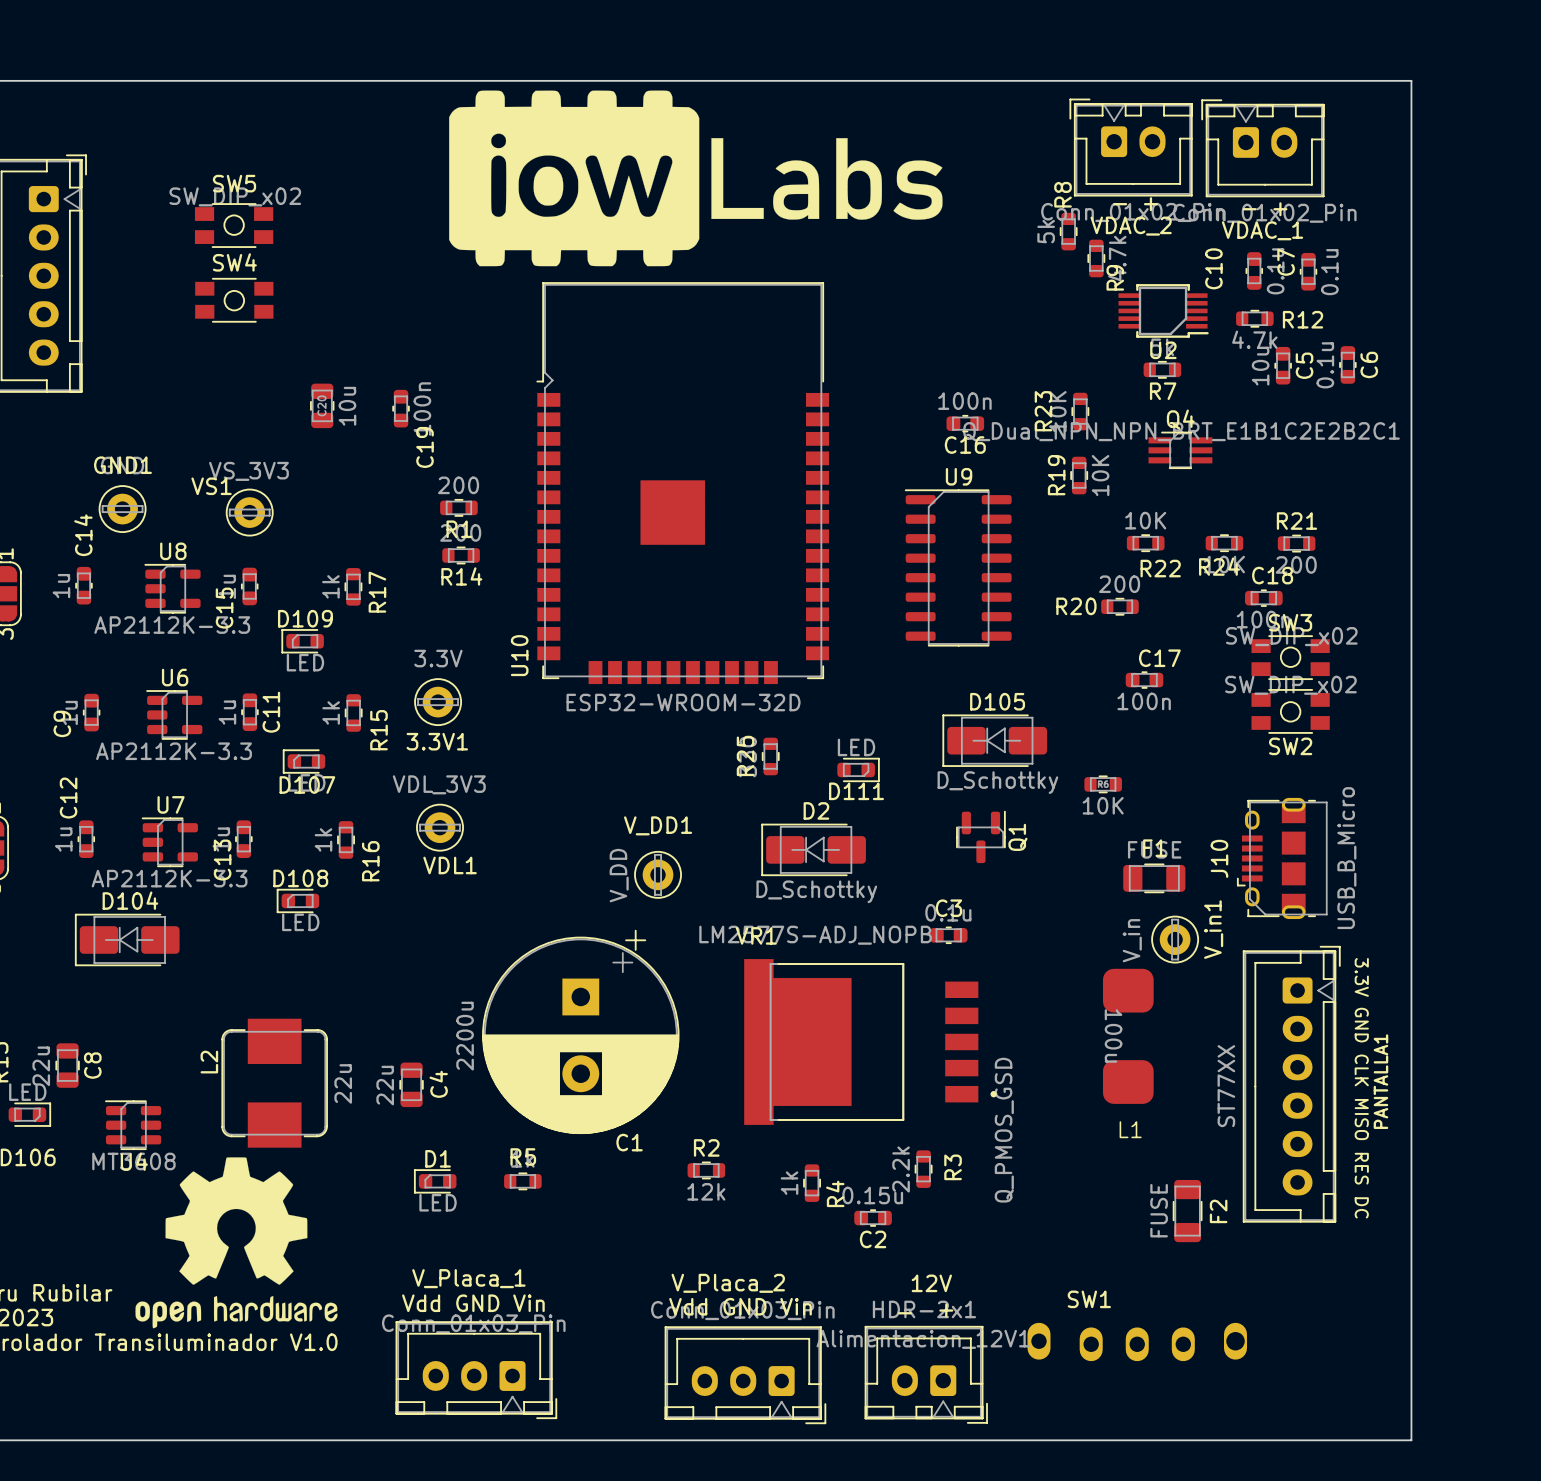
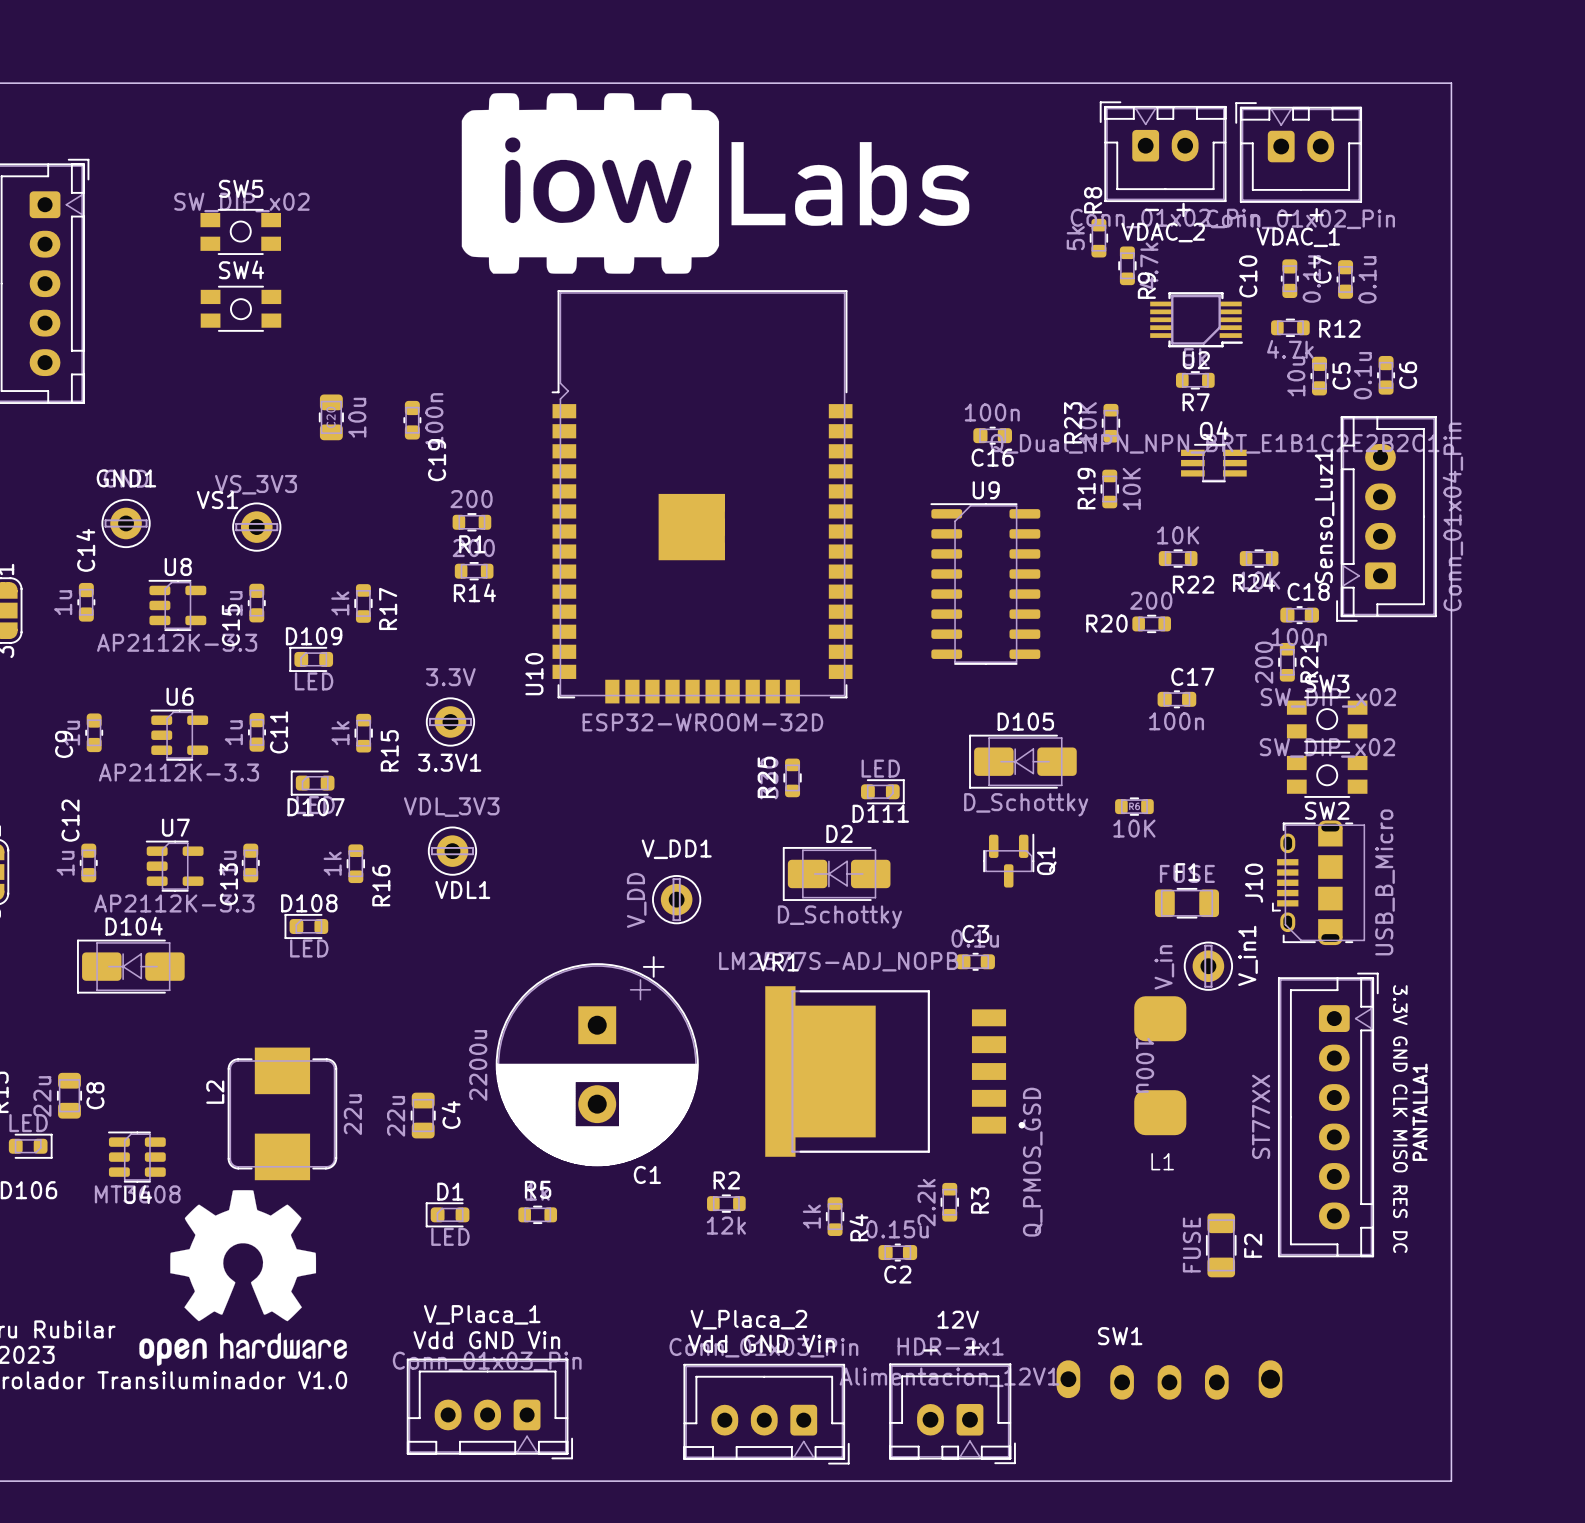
Senso_Luz1: none -> Conn_01x04_Pin (1386, 518)
R21 rotation: 0° (1296, 543) -> 90° clockwise (1287, 662)
R21 position: (1296, 543) -> (1287, 662)
SW3 position: (1290, 657) -> (1327, 719)
SW2 position: (1290, 711) -> (1327, 774)

